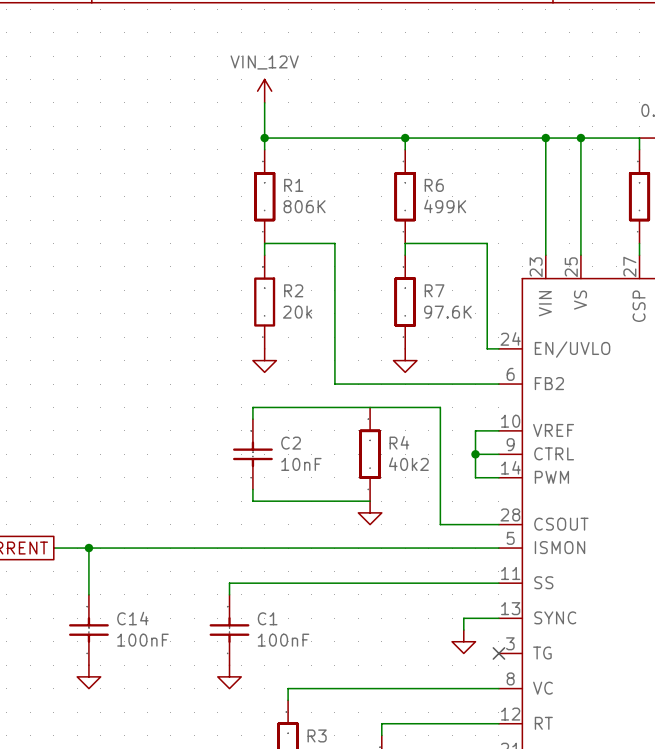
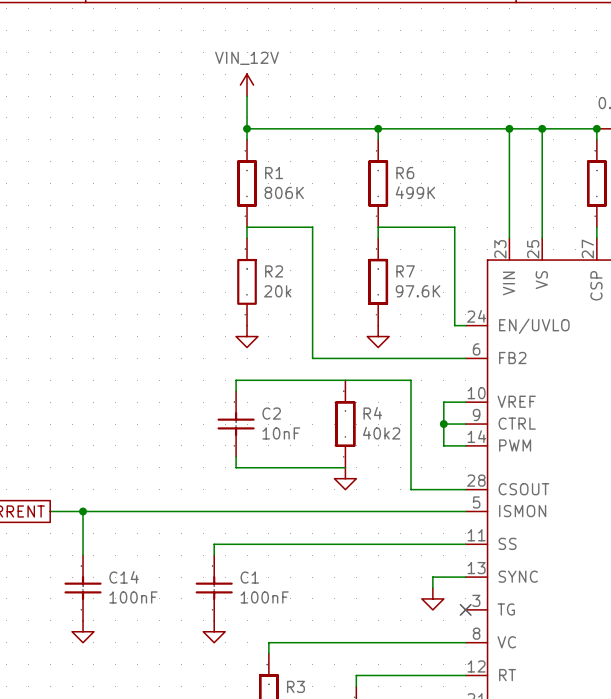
junction: none -> (596, 128)

